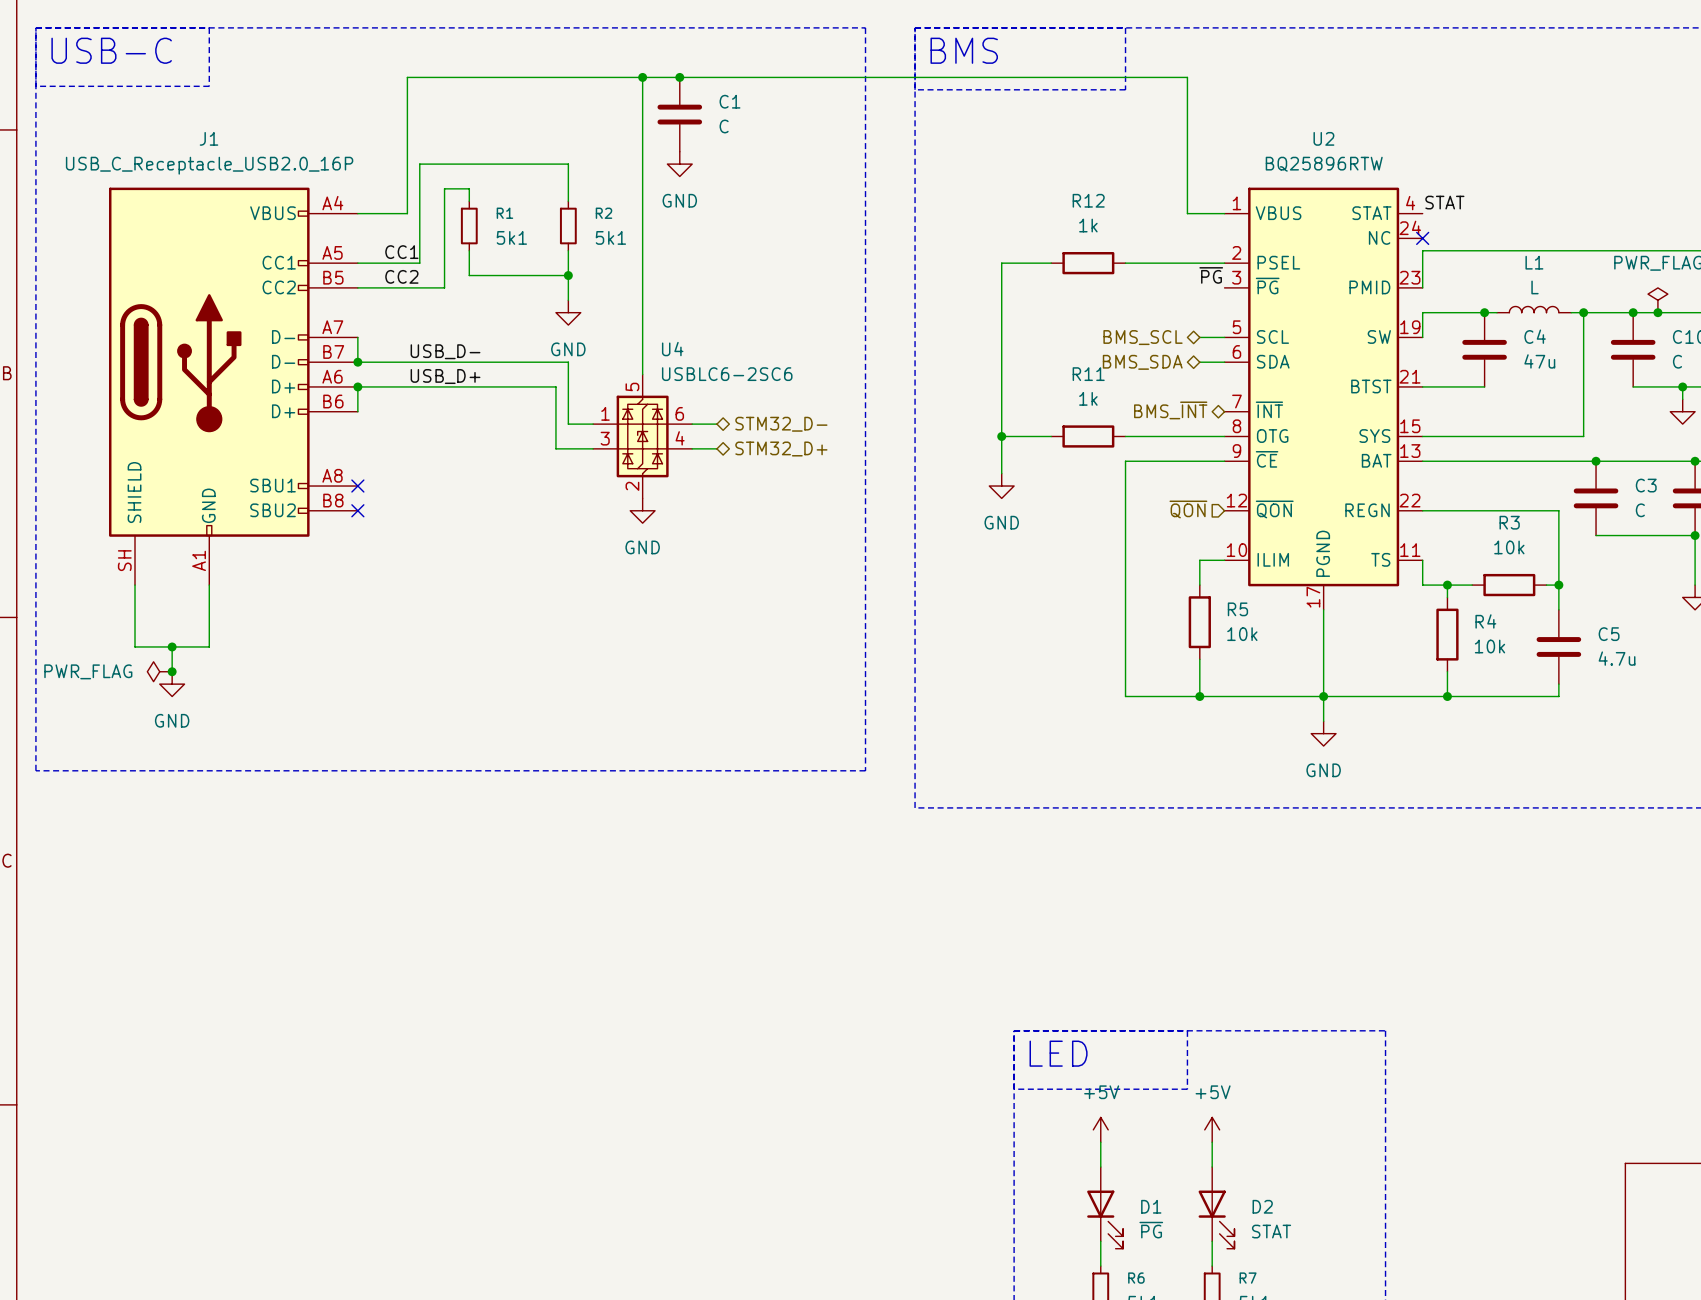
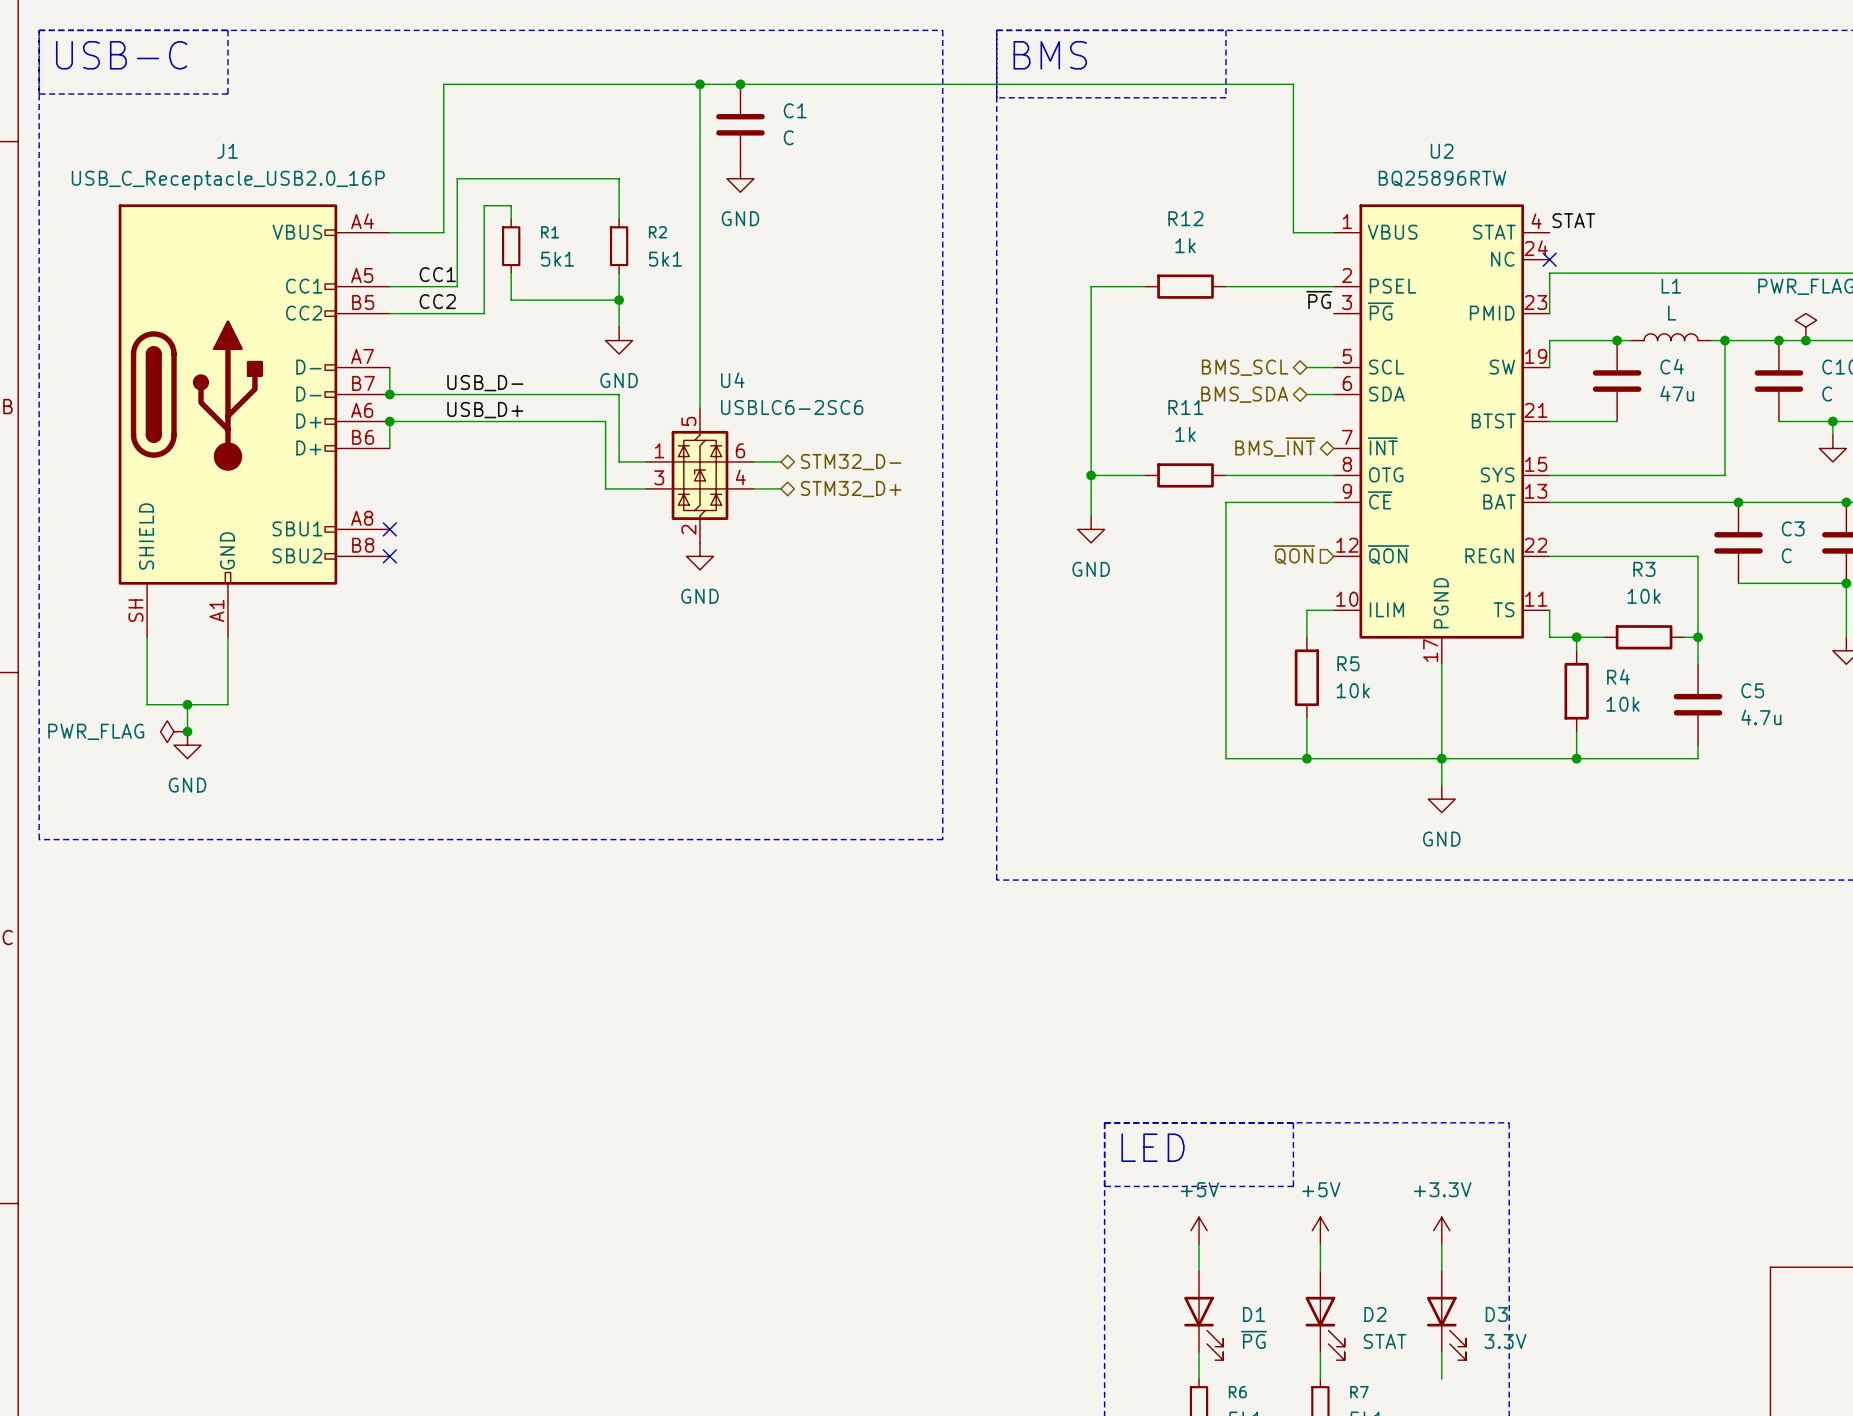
power symbol: none -> +3.3V (1441, 1230)
wire: none -> (1441, 1244) (1441, 1271)
D3: none -> 3.3V (1446, 1315)
wire: none -> (1441, 1352) (1441, 1379)

